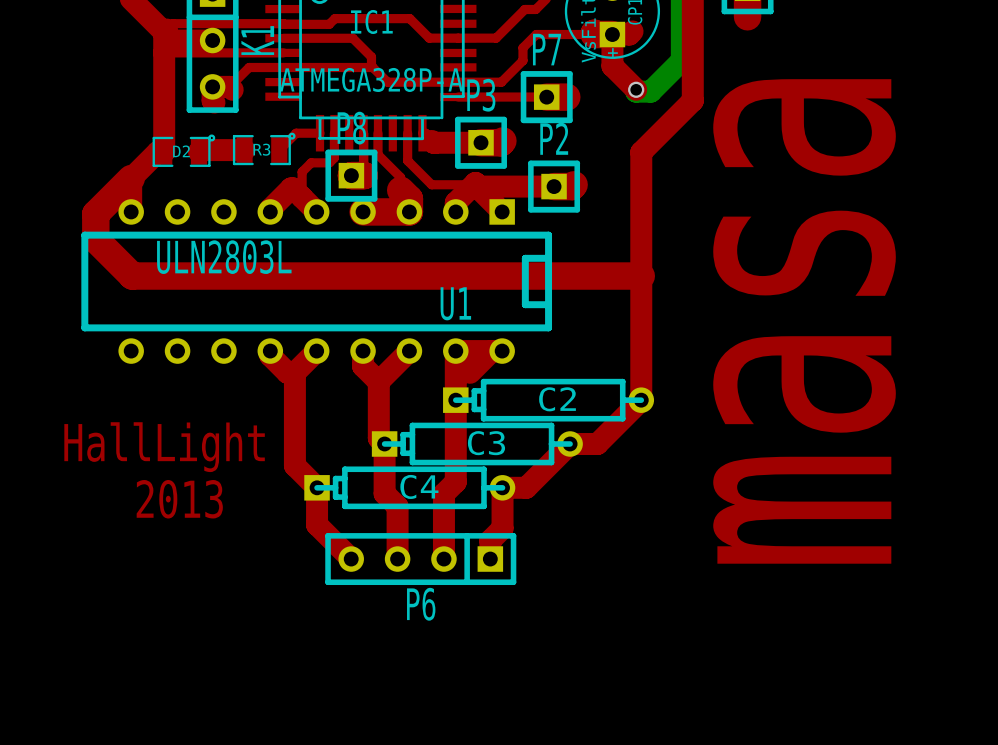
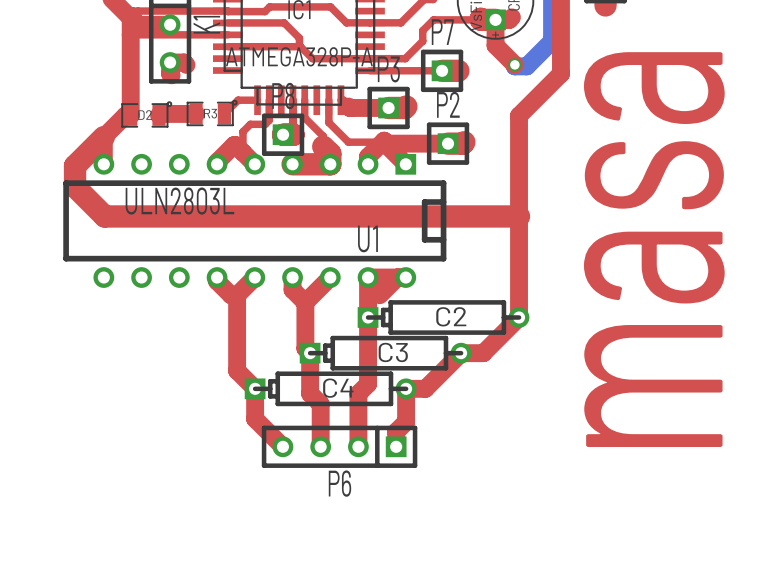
top track: (283, 67) (249, 67) (229, 86) -> none
text: HallLight (164, 447) -> none
text: 2013 (179, 499) -> none

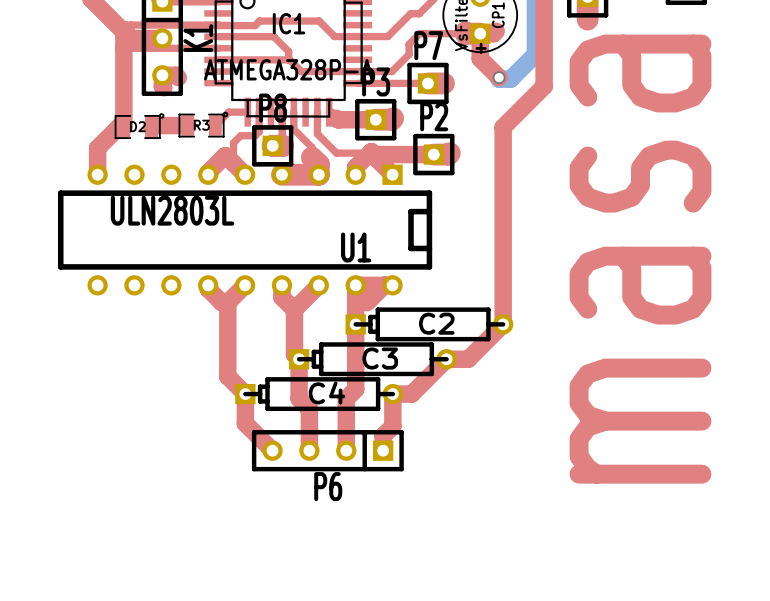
top track: (103, 137) (75, 165) (75, 186) (104, 216) (519, 216) -> none

